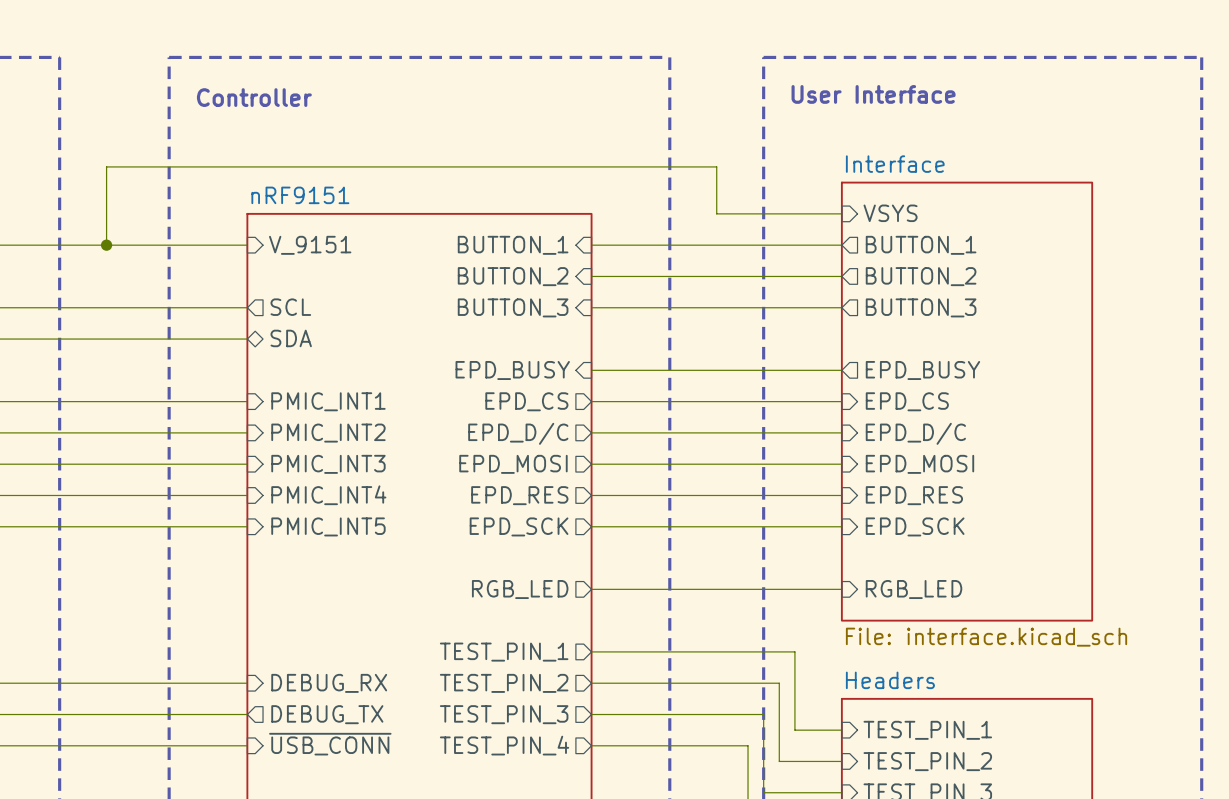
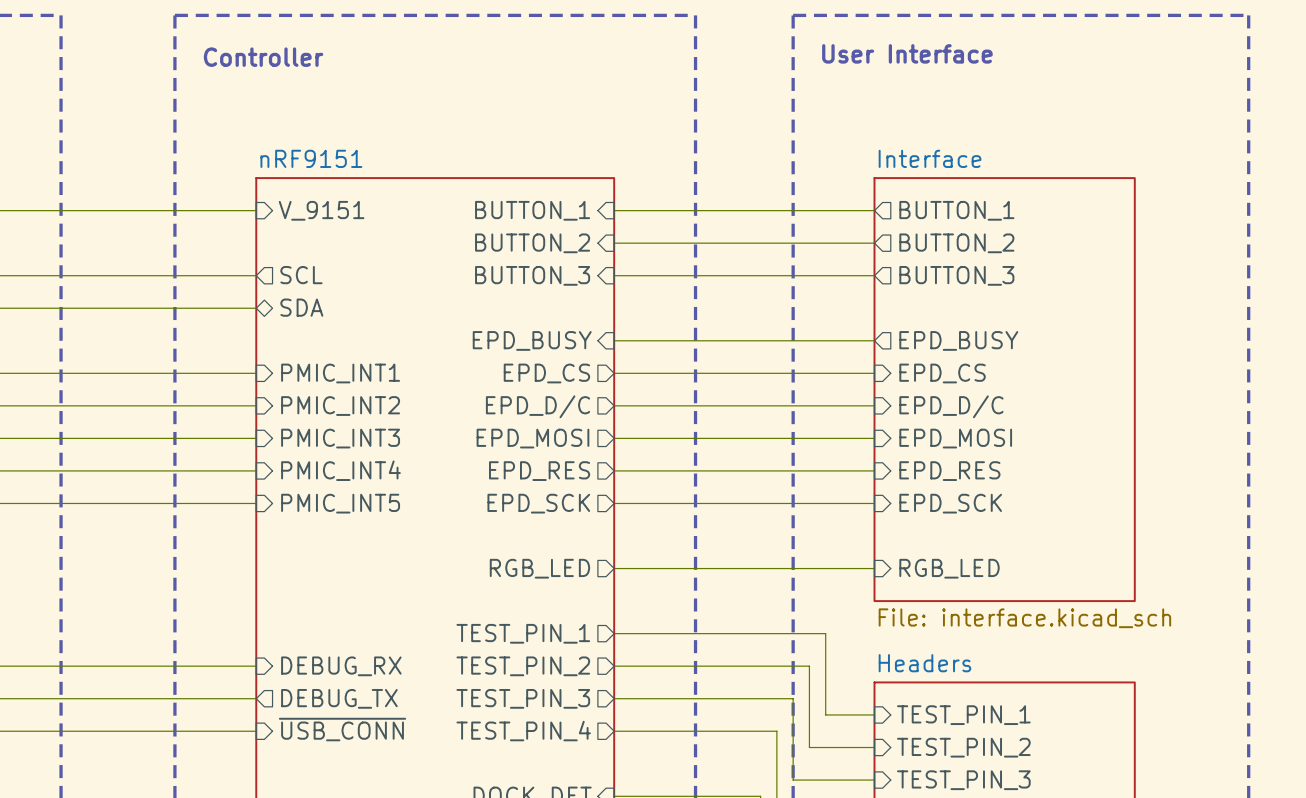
wire: (841, 213) (716, 213) (716, 166) (106, 166) (106, 245) -> none
sheet pin: VSYS (890, 213) -> none
junction: (106, 245) -> none
sheet Interface: File: interface.kicad_sch (967, 401) -> none
sheet Interface: none -> File: interface.kicad_sch (1004, 389)

